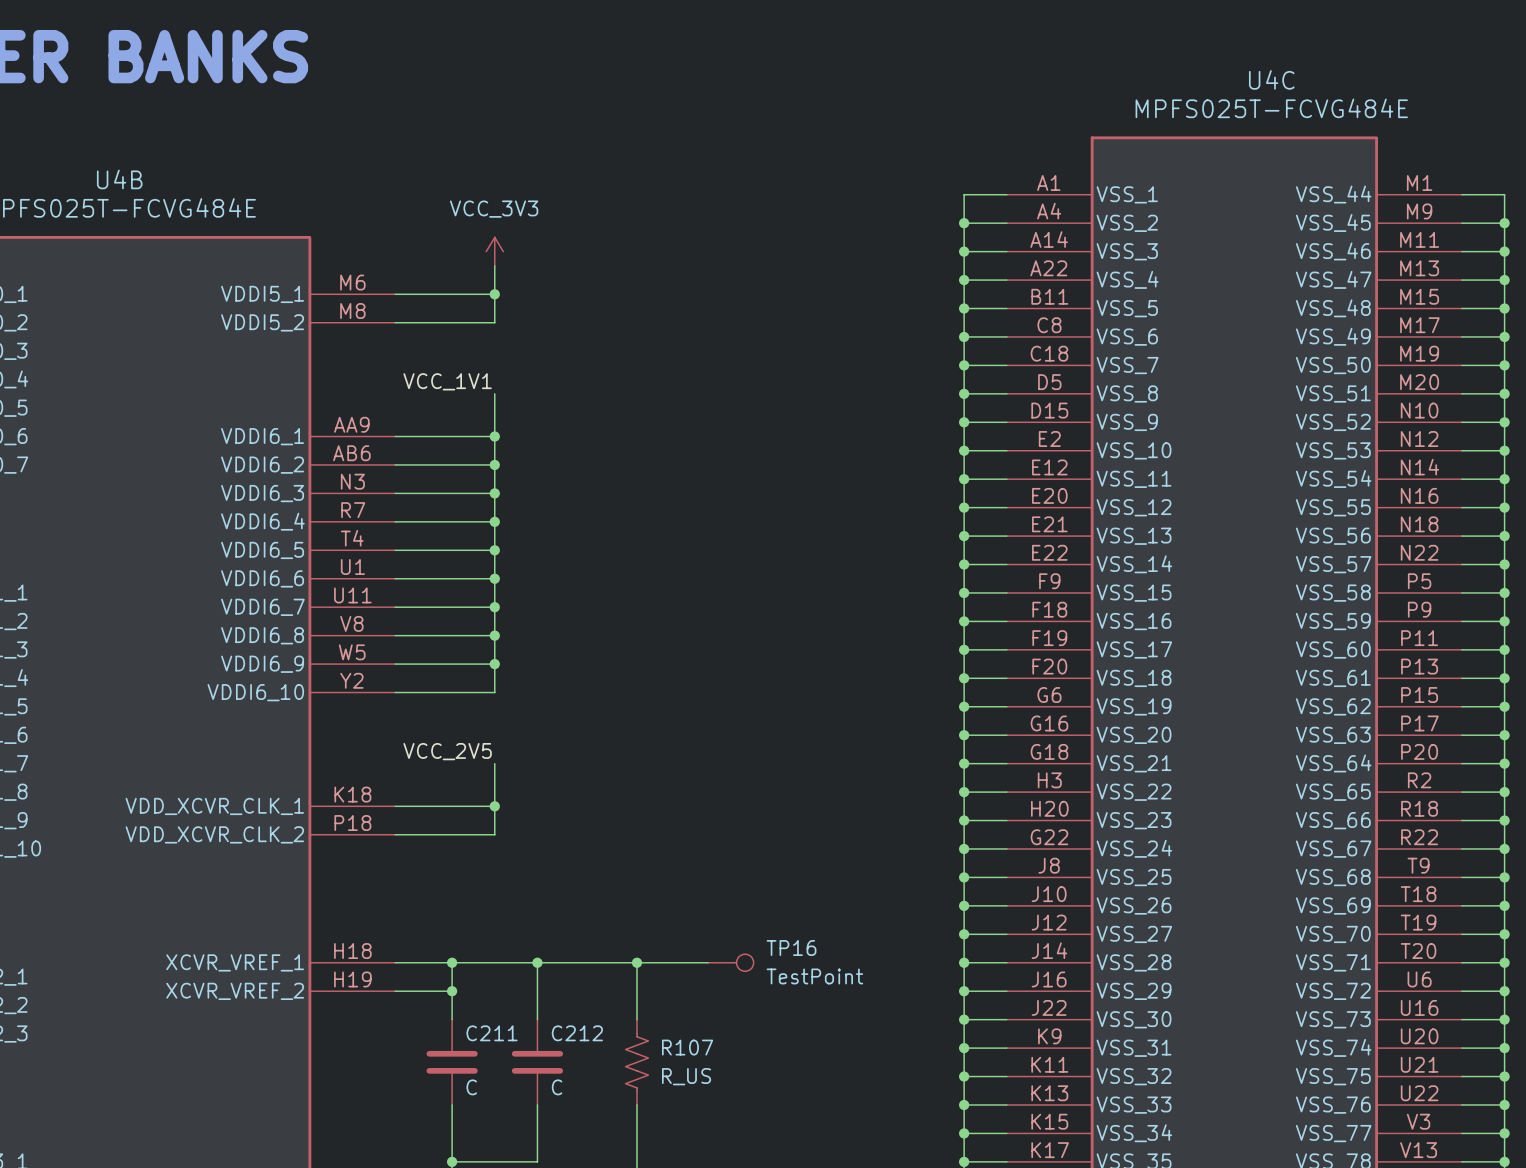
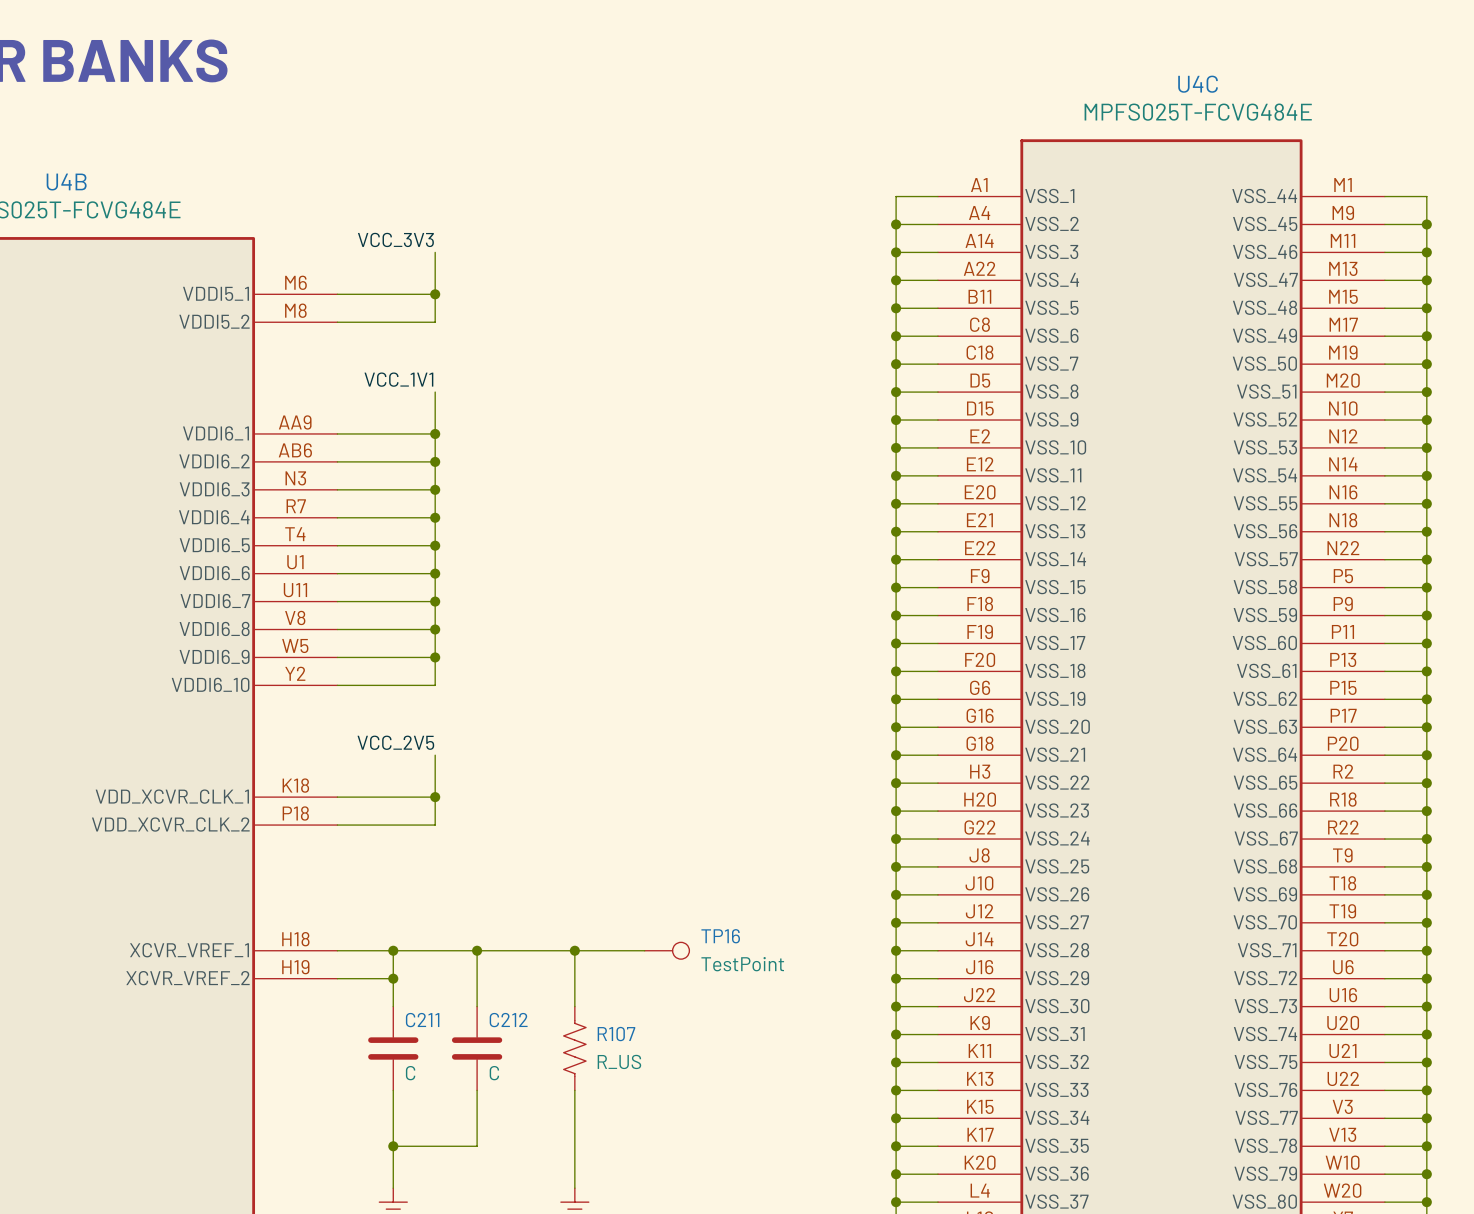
label: none -> VCC_3V3 (395, 239)
power symbol: VCC_3V3 (494, 251) -> none

